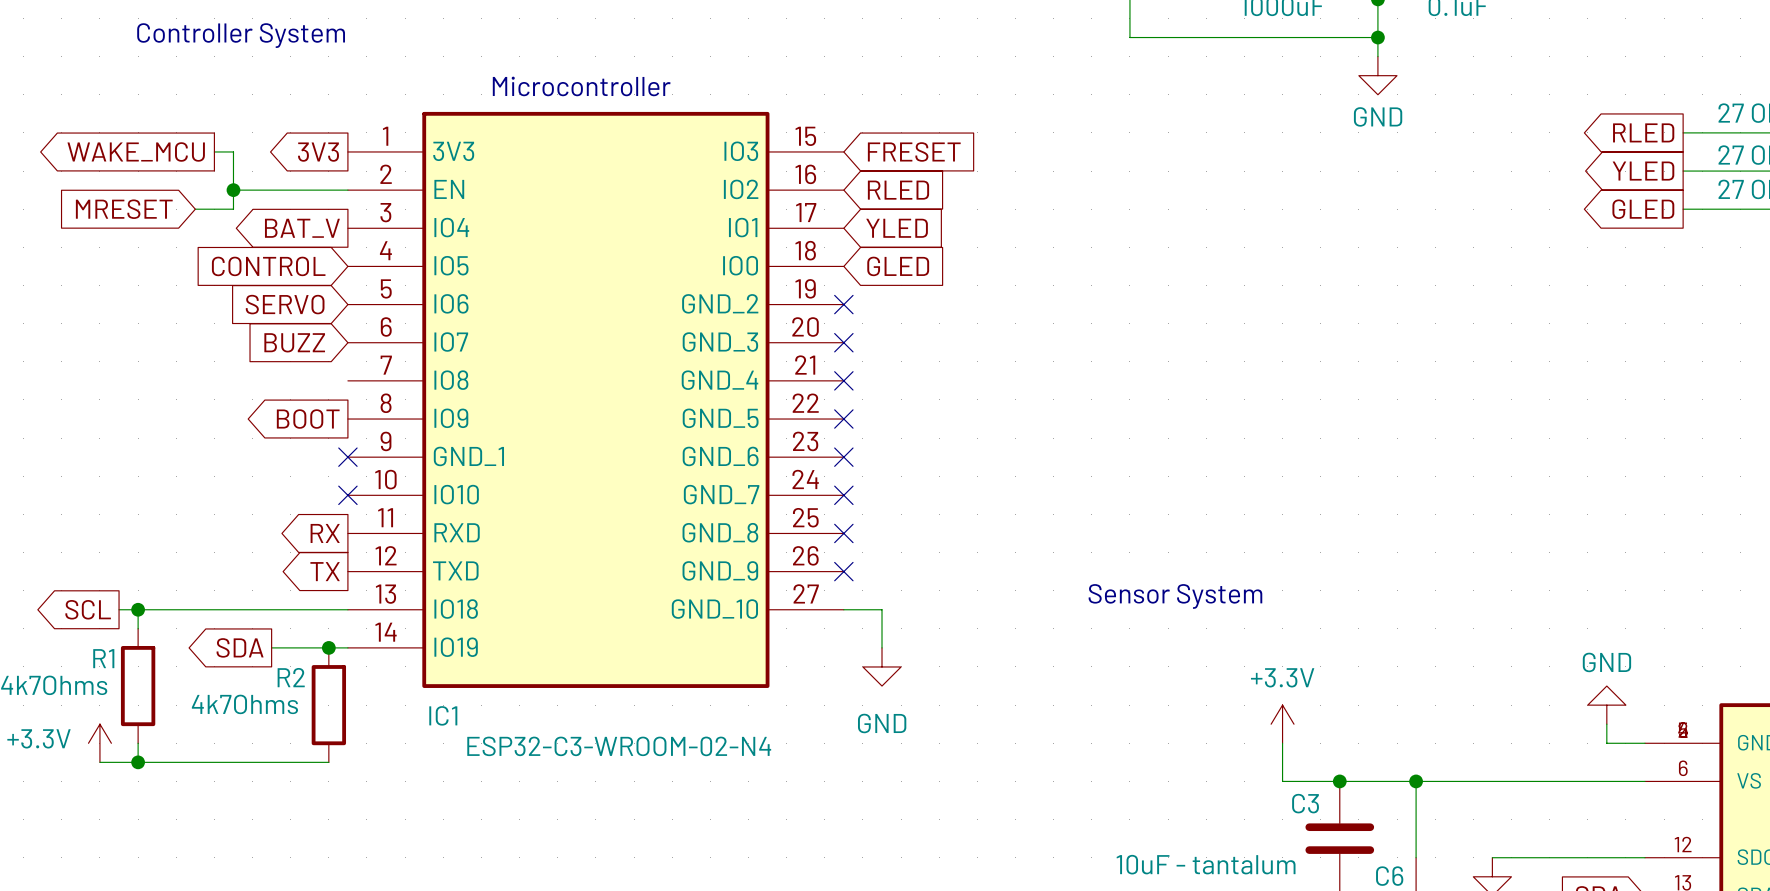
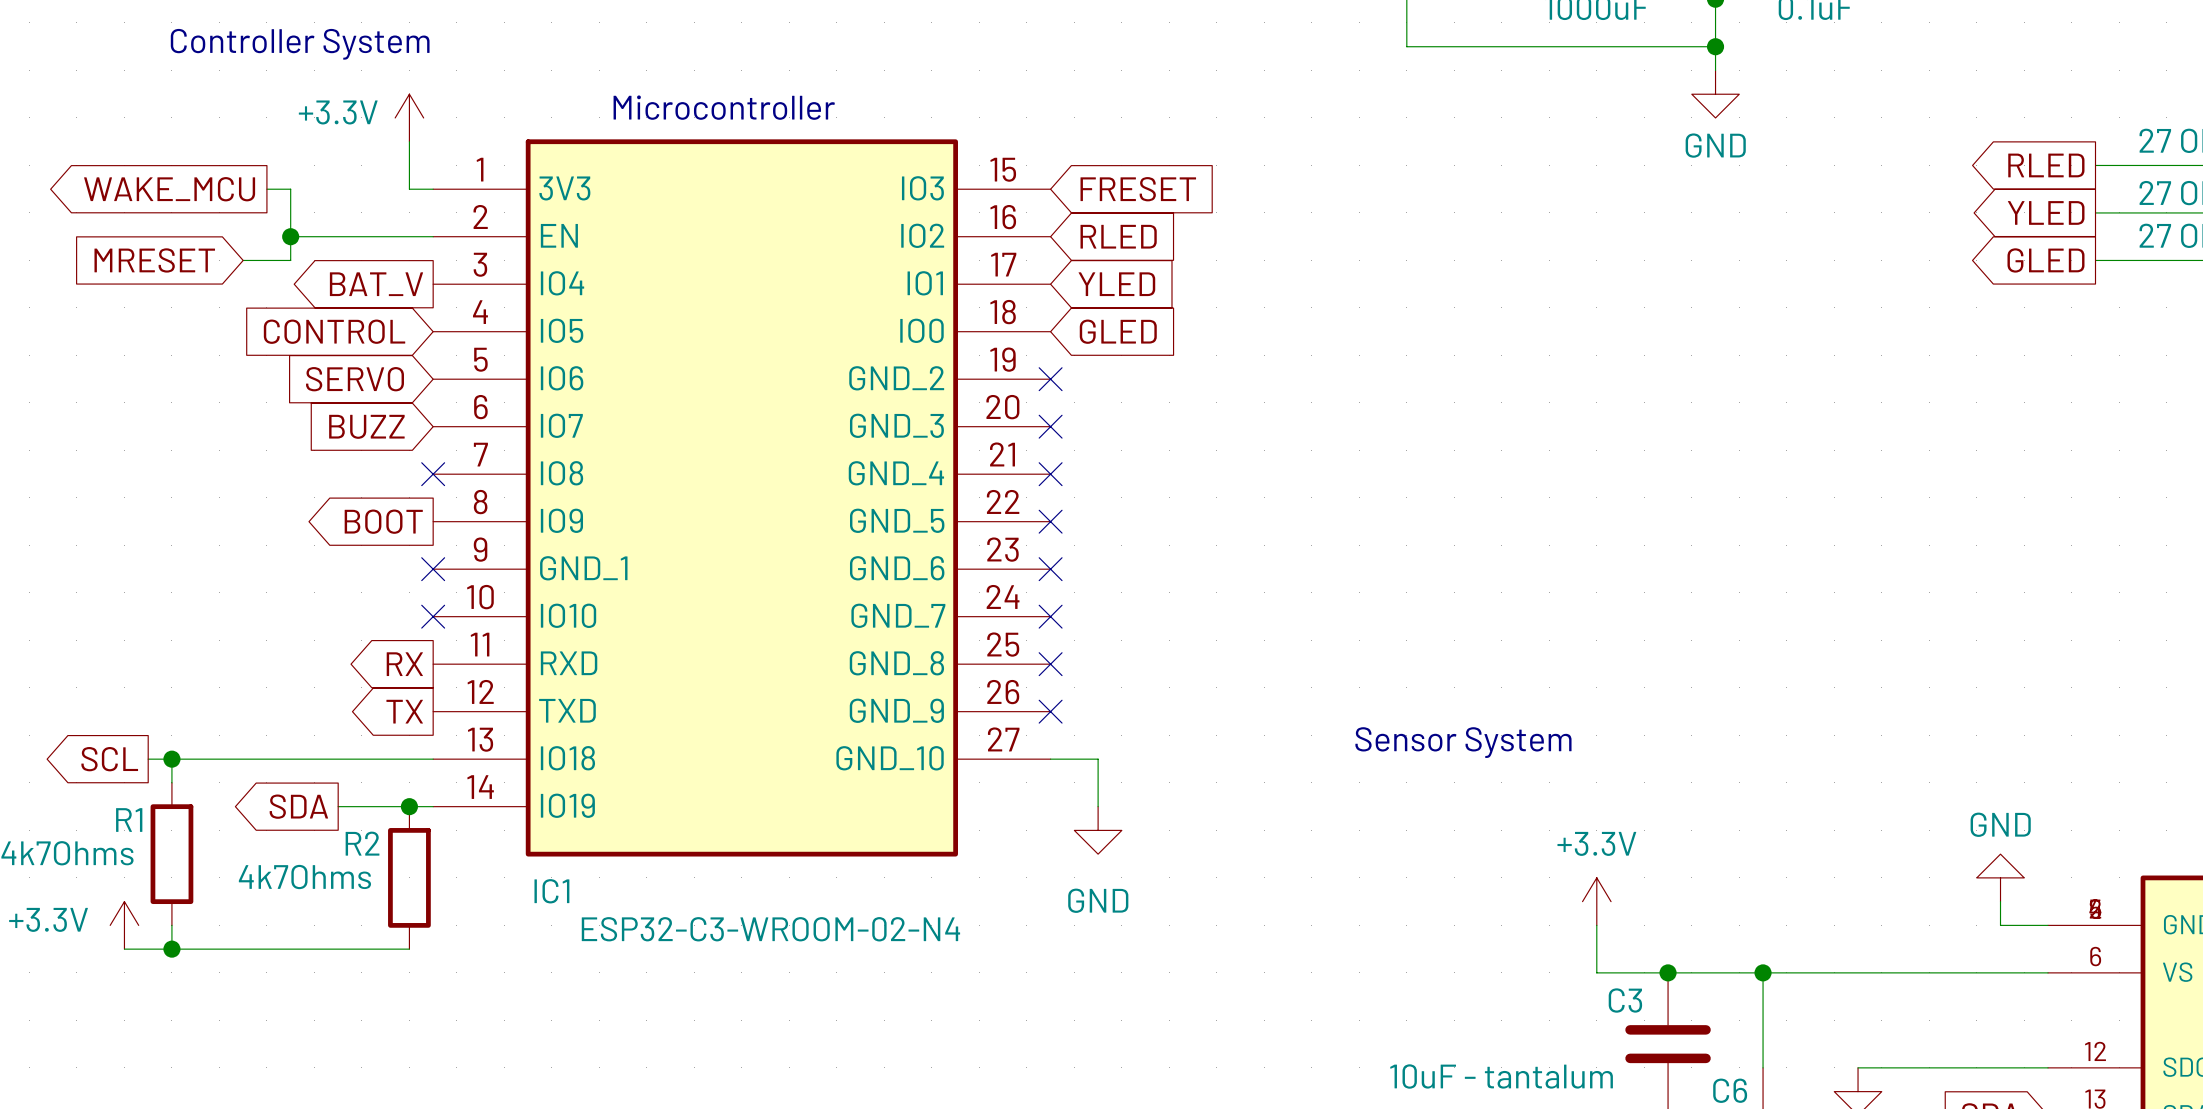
power symbol: none -> +3.3V (409, 117)
wire: none -> (409, 141) (409, 189) (433, 189)
global label: 3V3 (318, 152) -> none
no-connect mark: none -> (433, 474)

